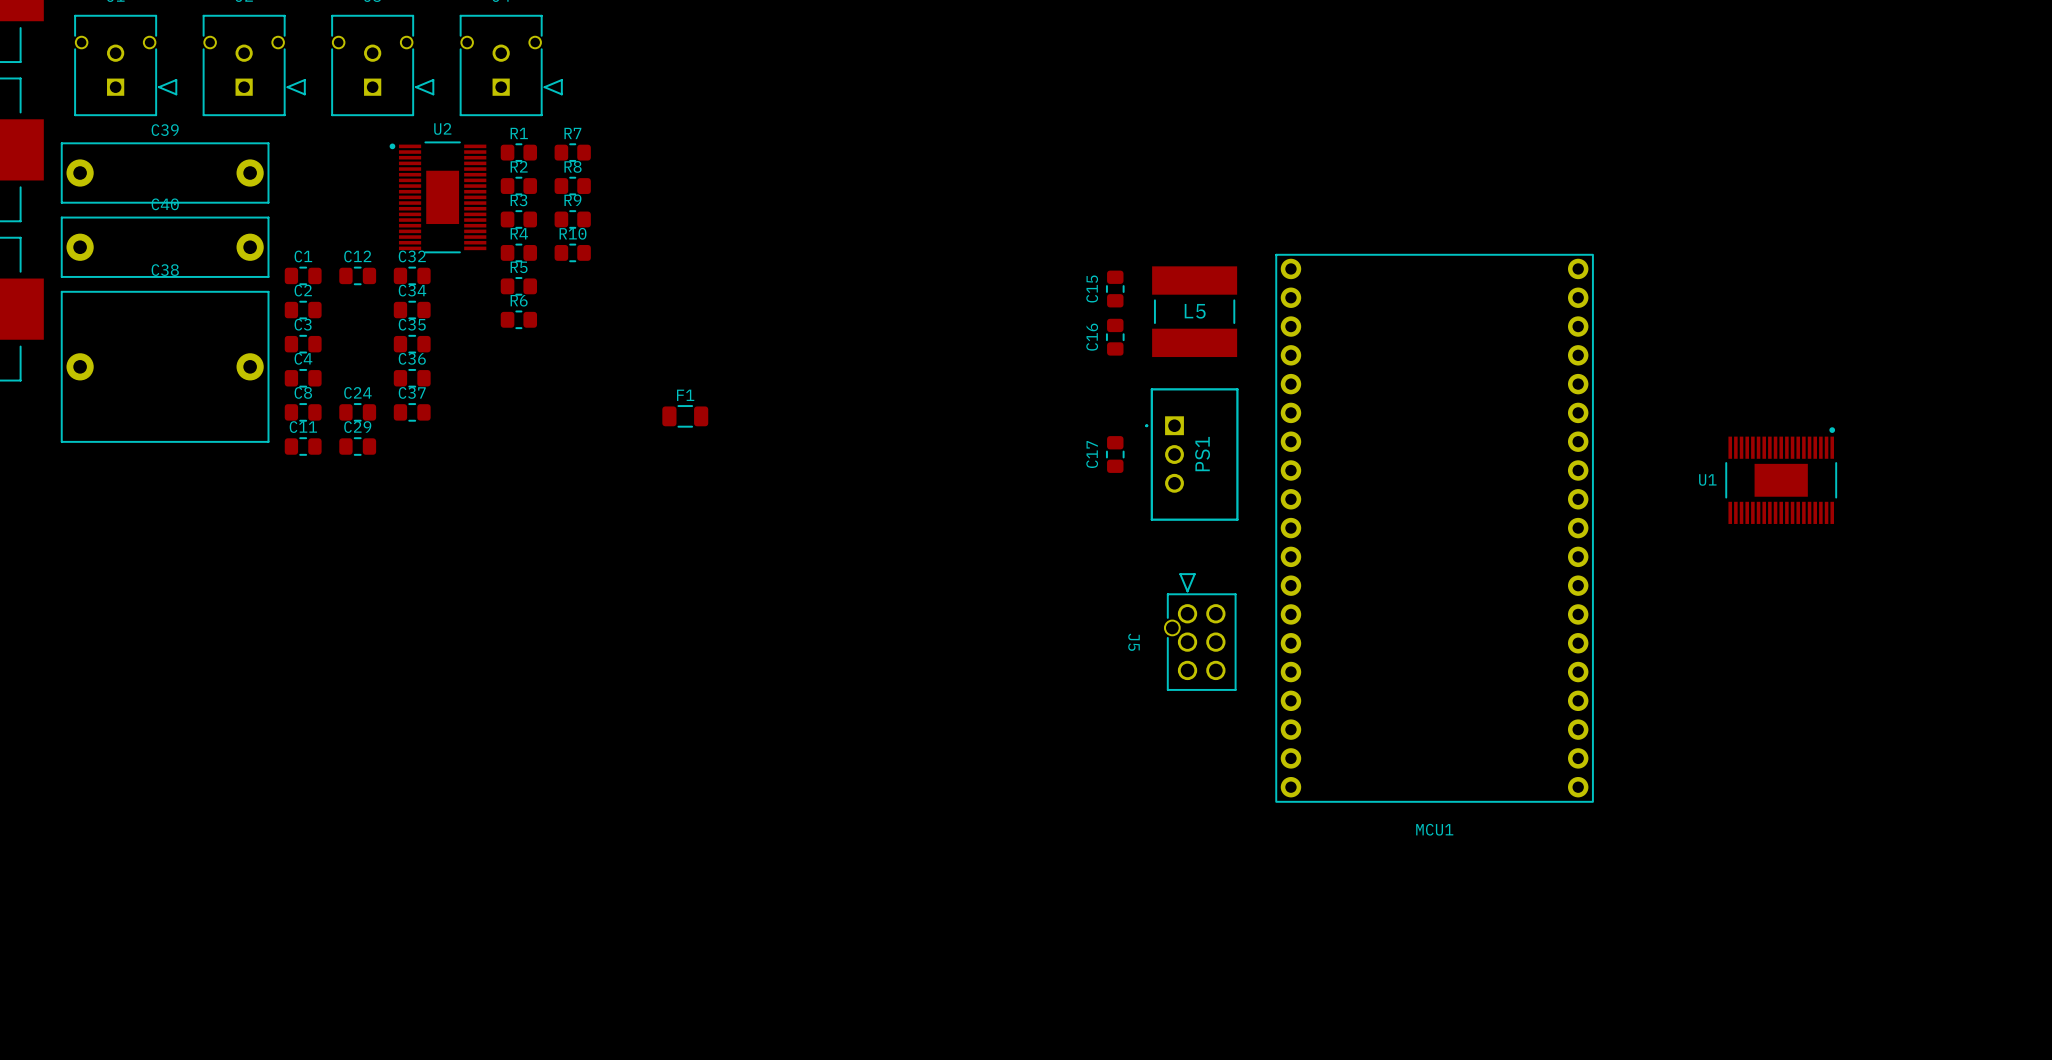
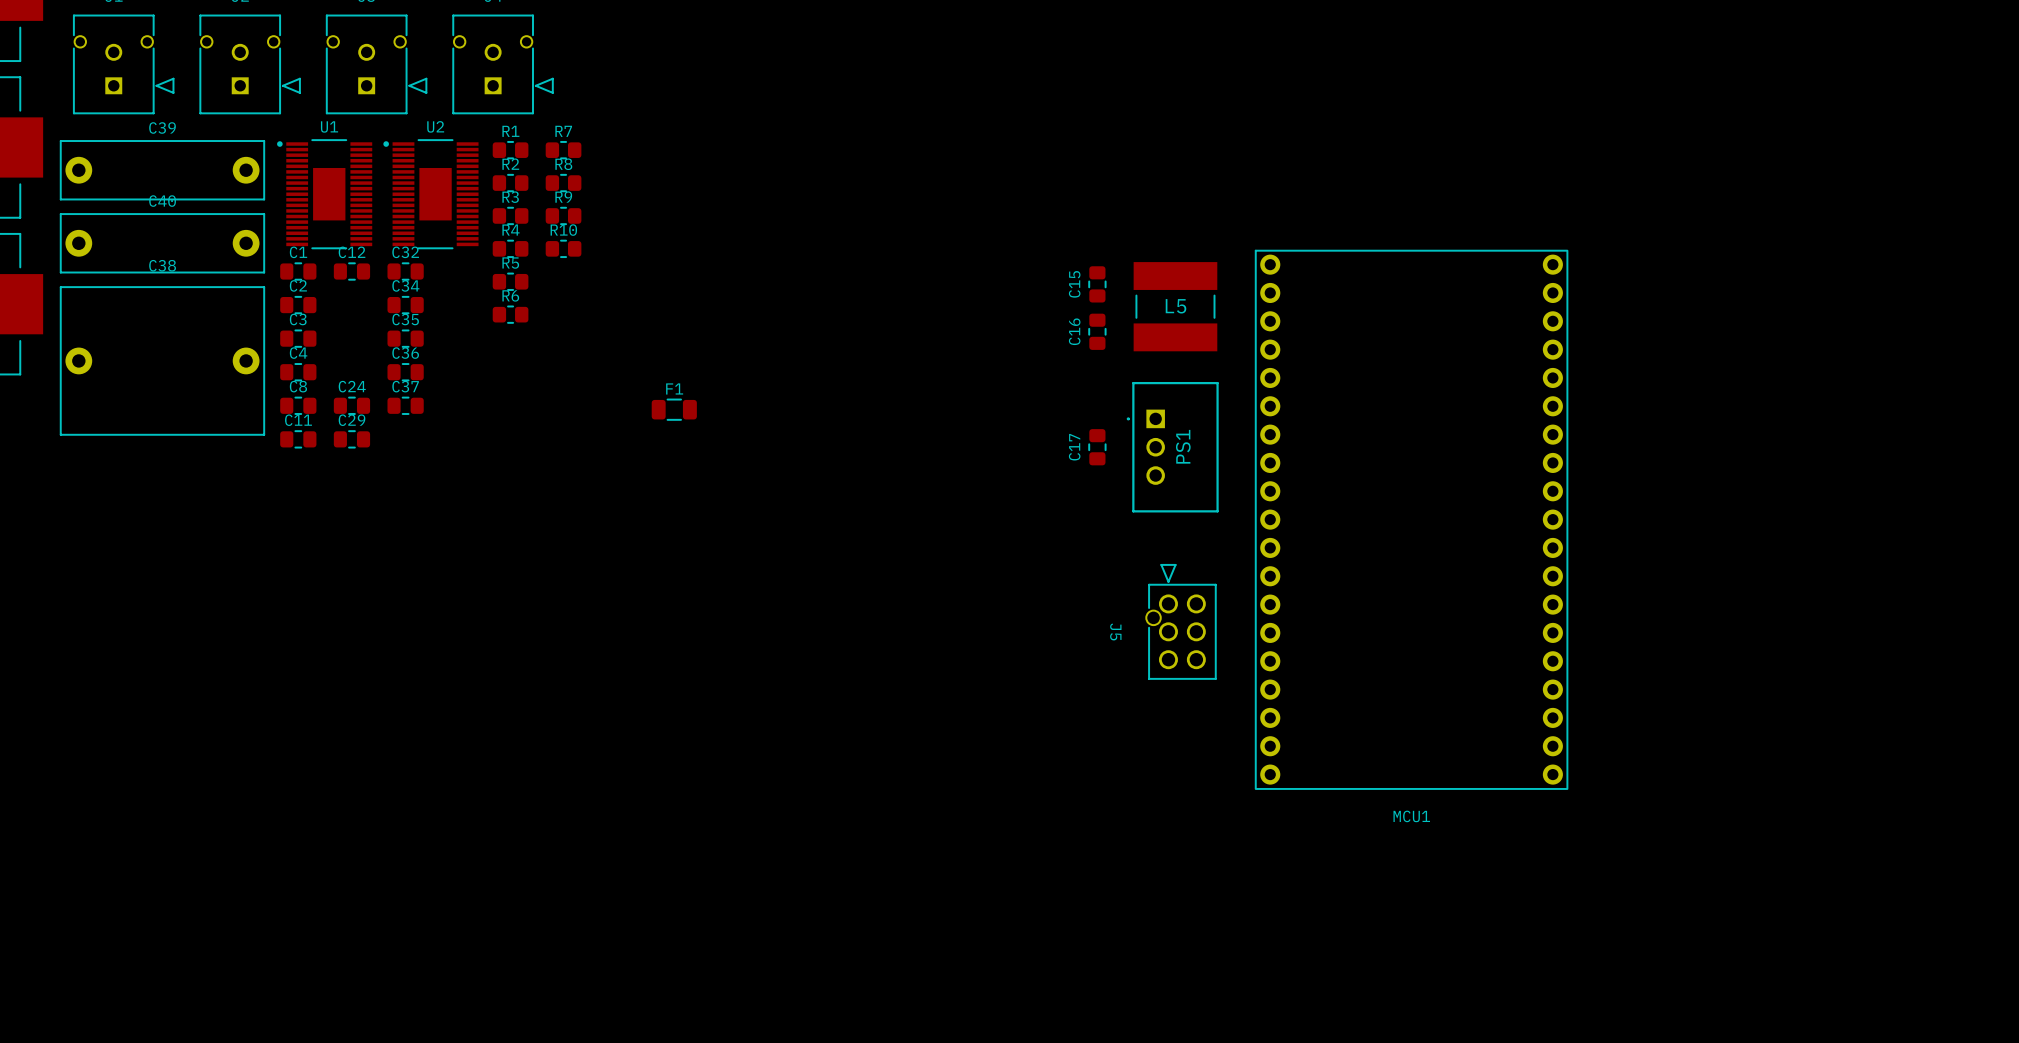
U1 rotation: 0° (1781, 475) -> 90° counterclockwise (324, 194)
U1 position: (1781, 475) -> (324, 194)
U1 name position: U1 (1707, 479) -> U1 (329, 126)

